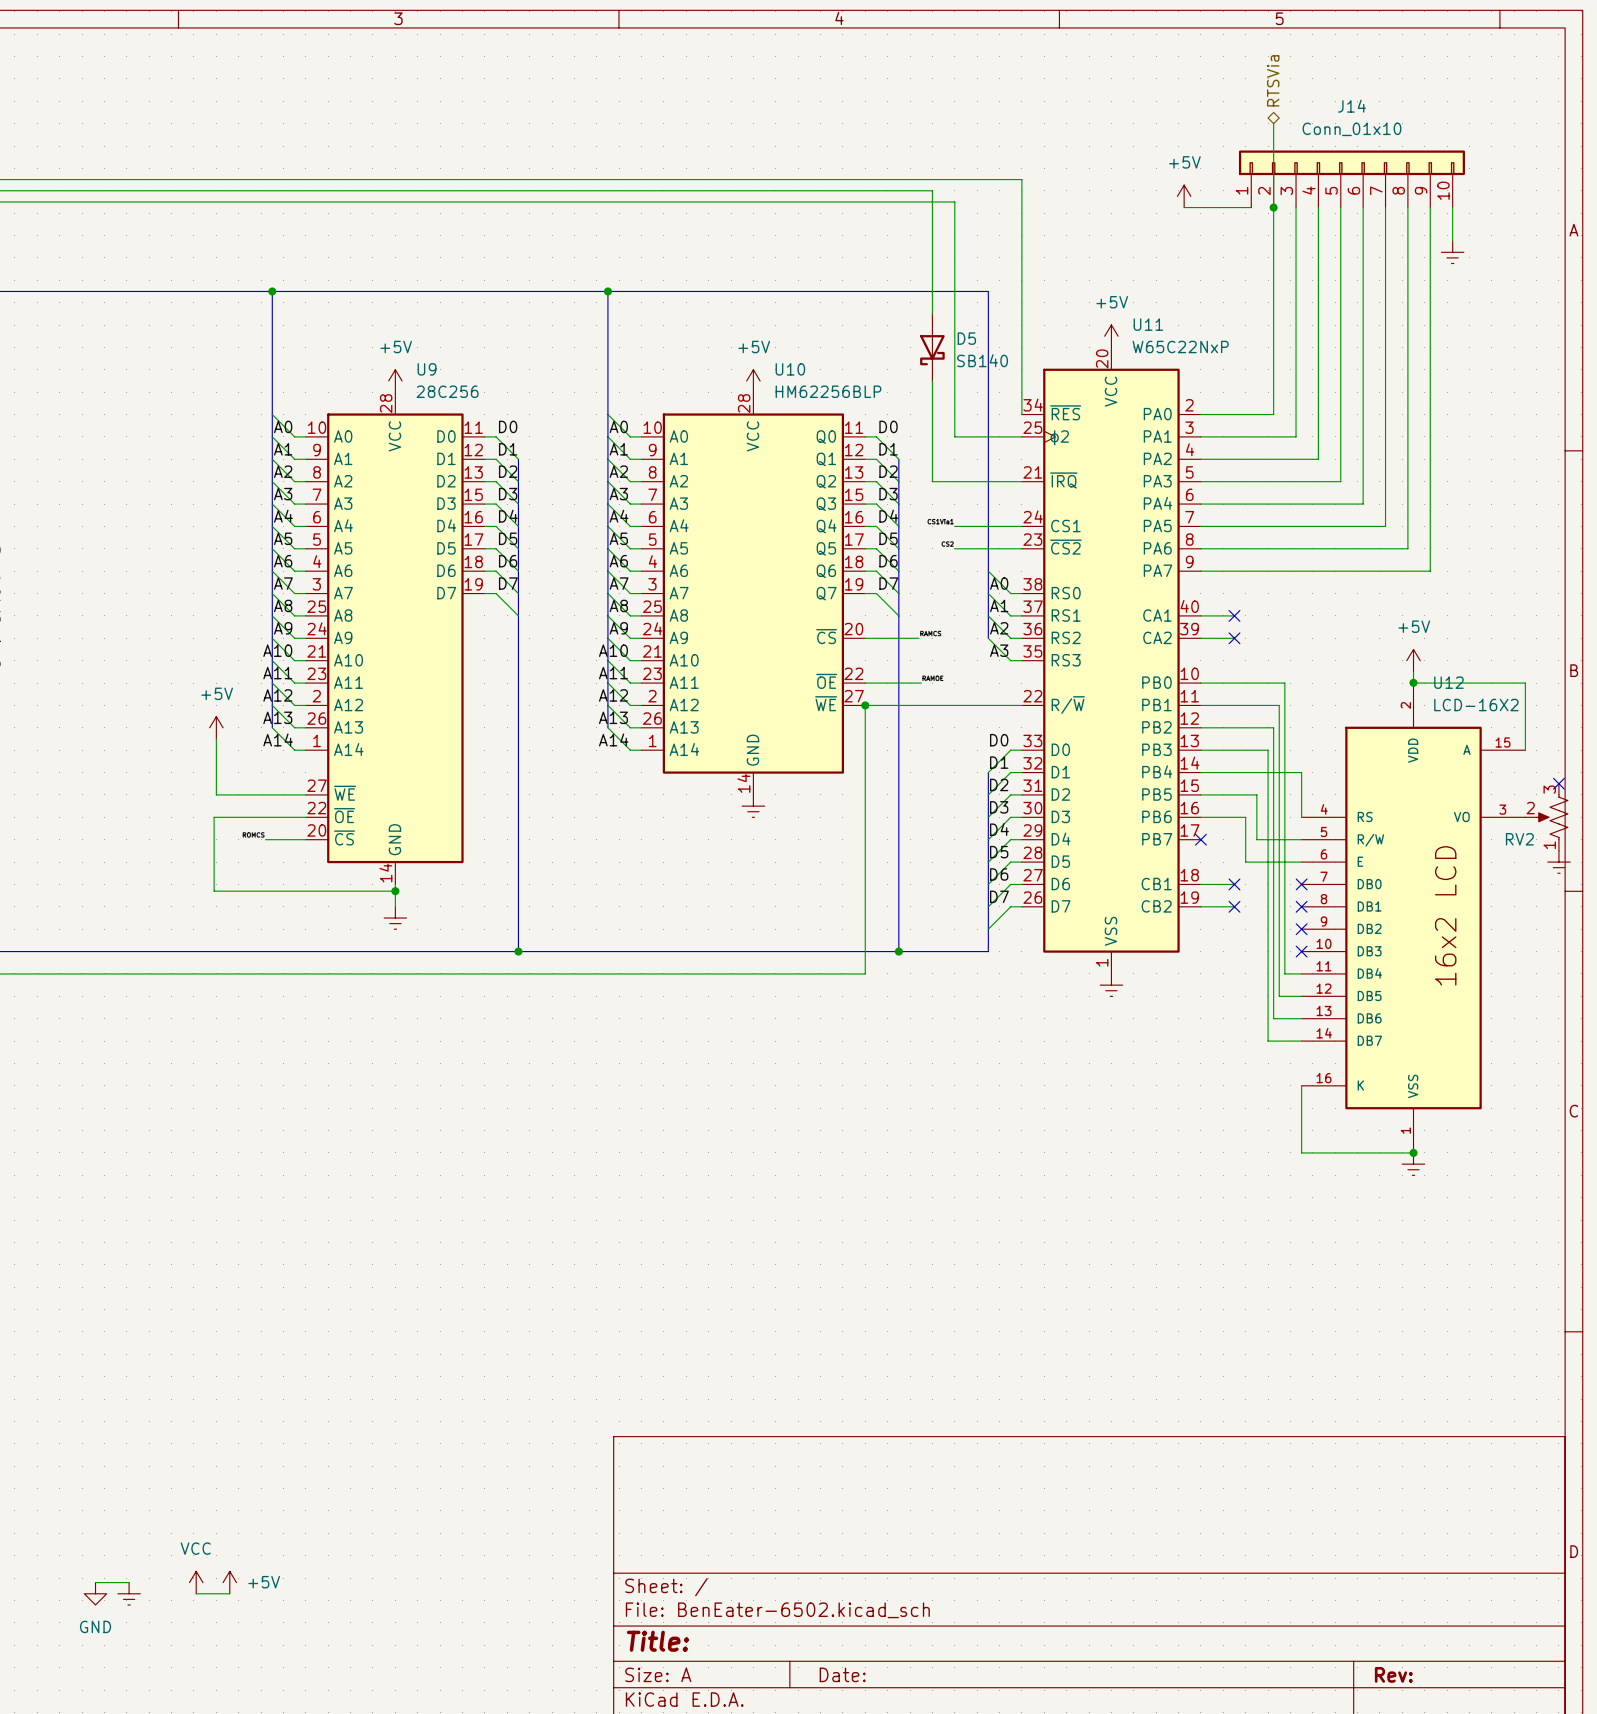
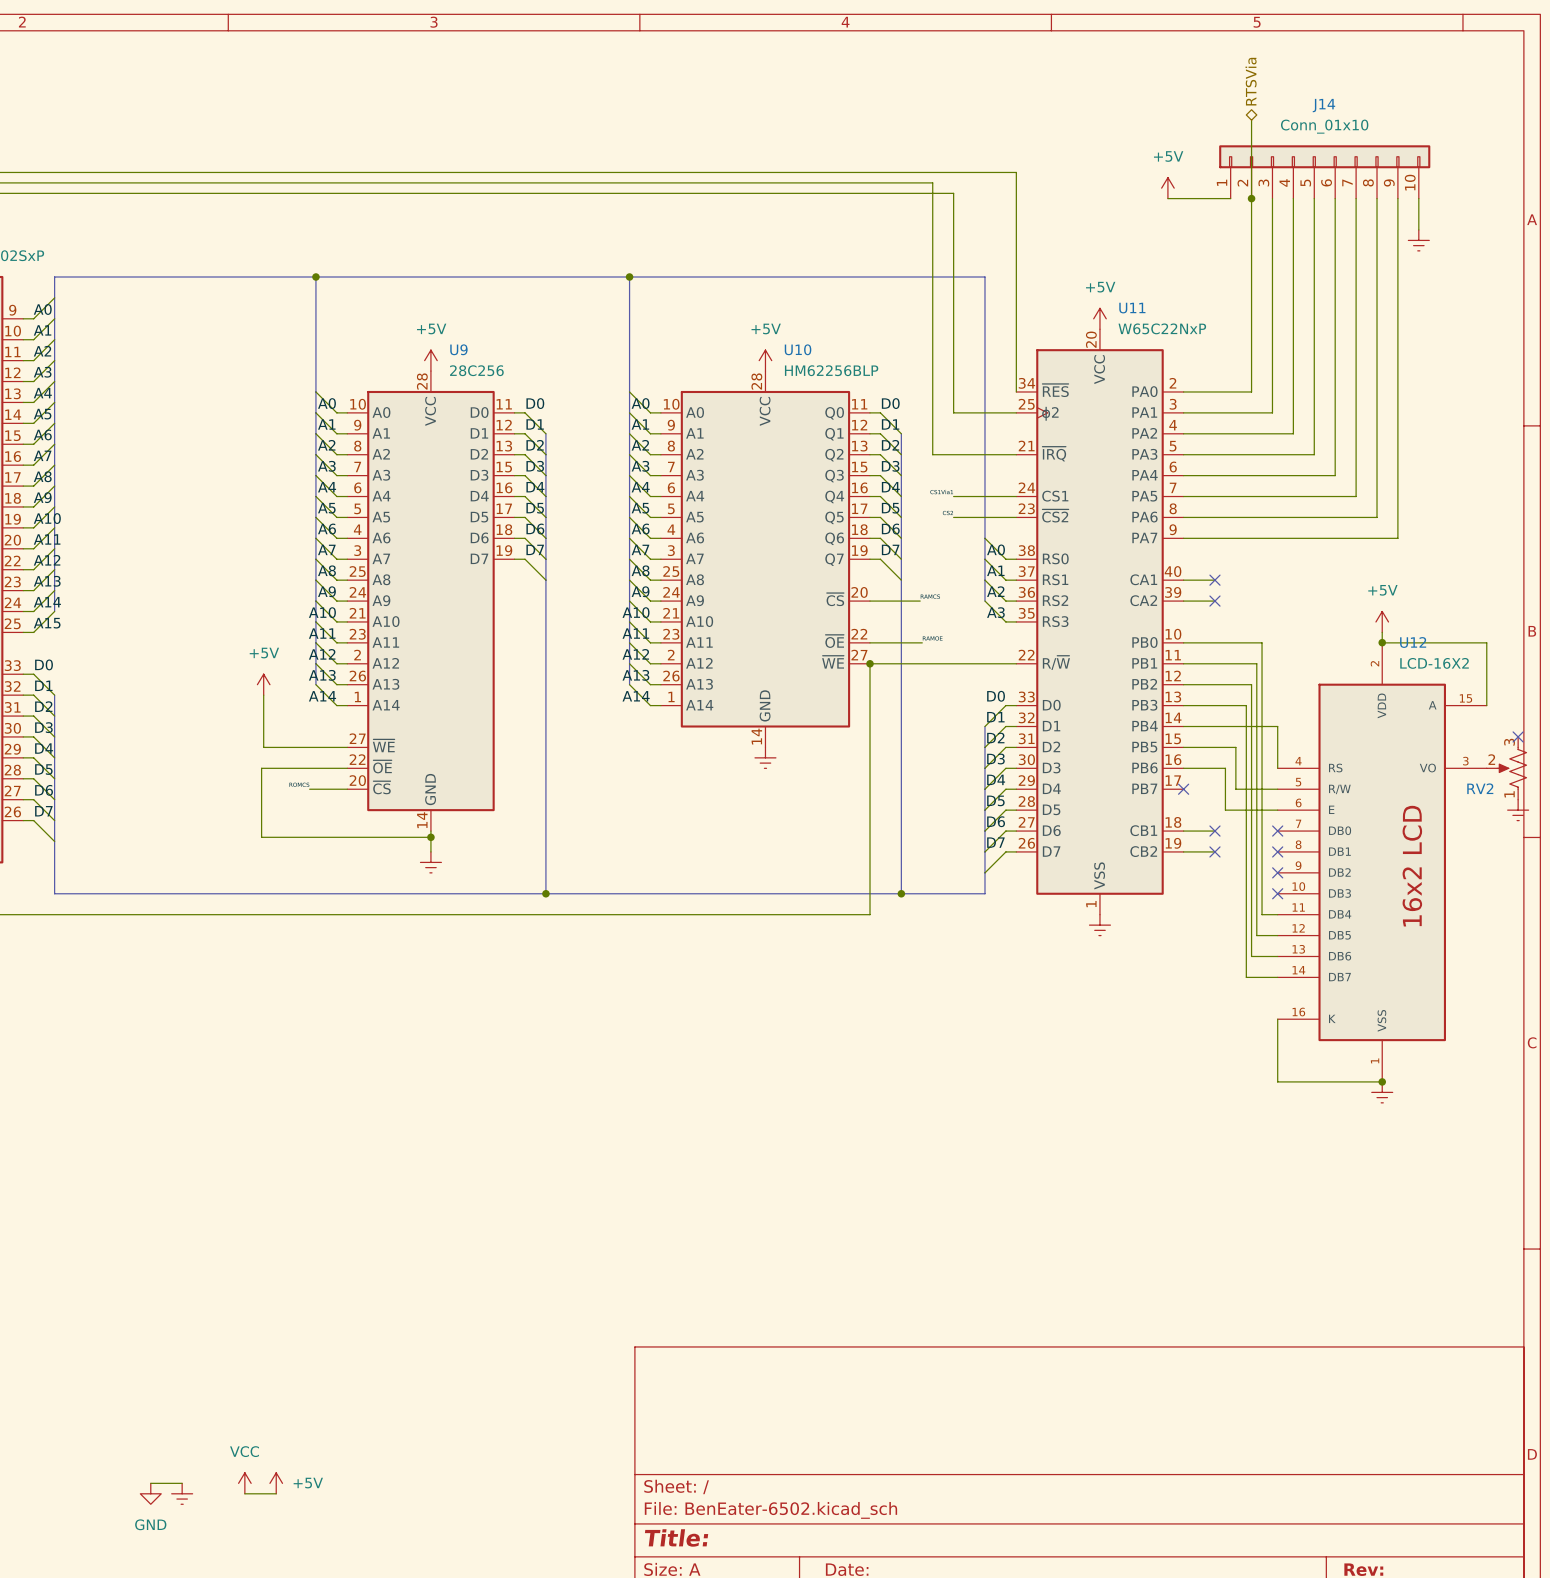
D5: SB140 (932, 347) -> none

